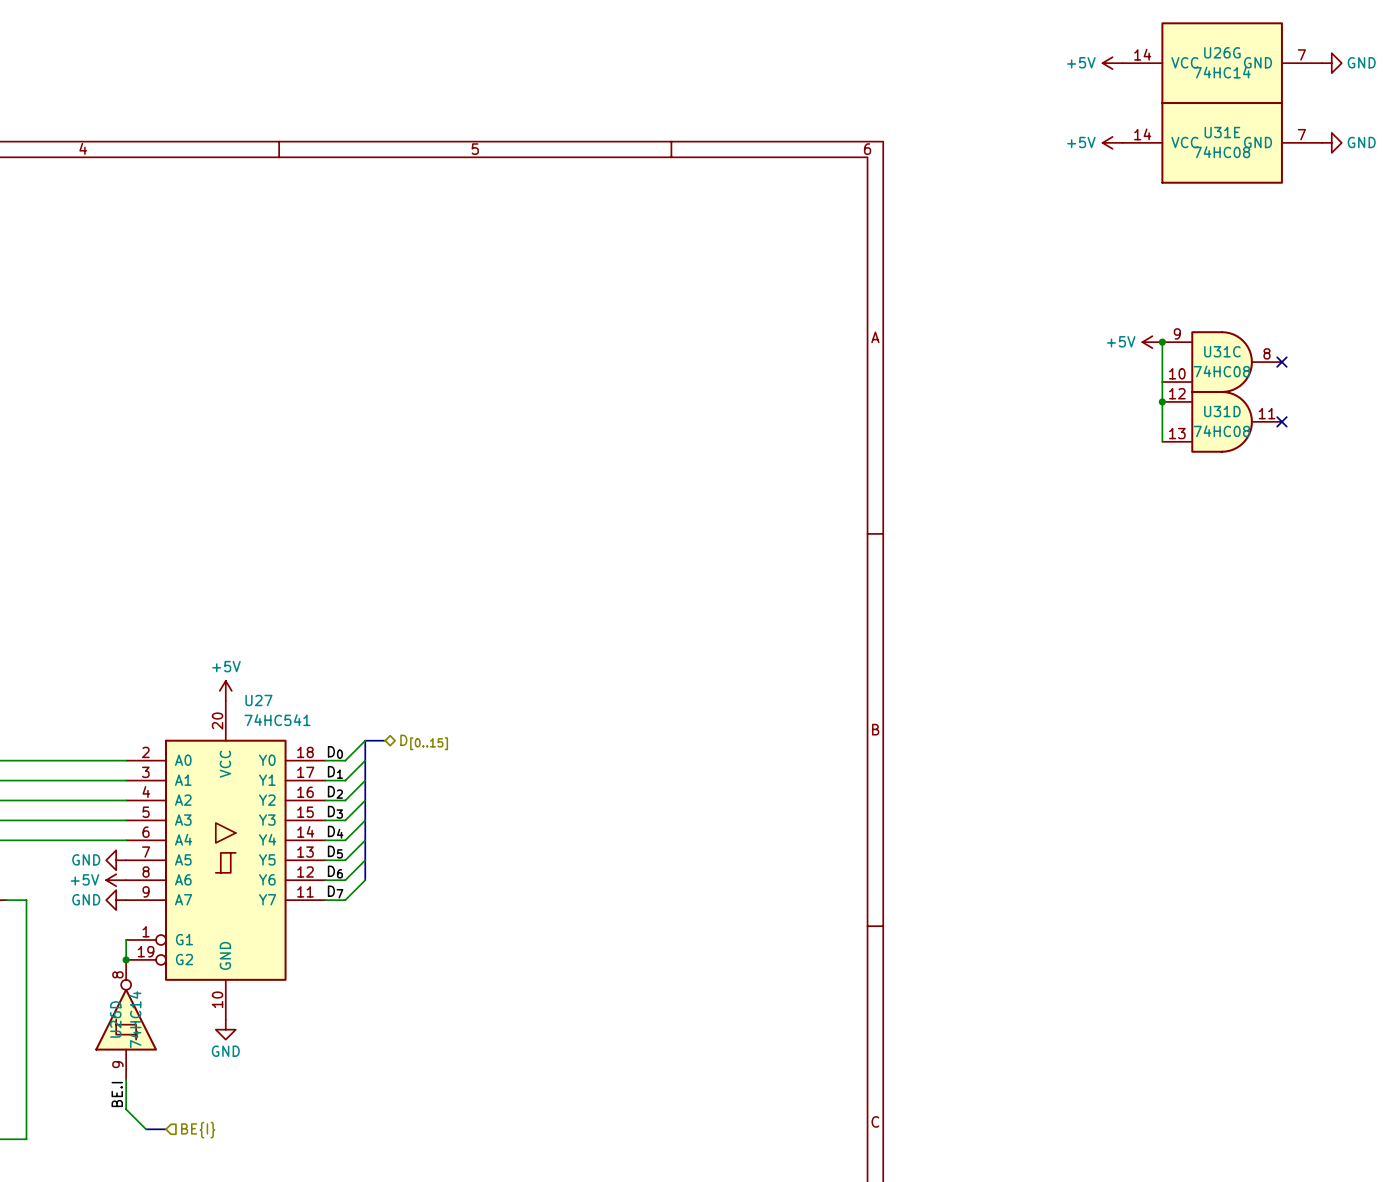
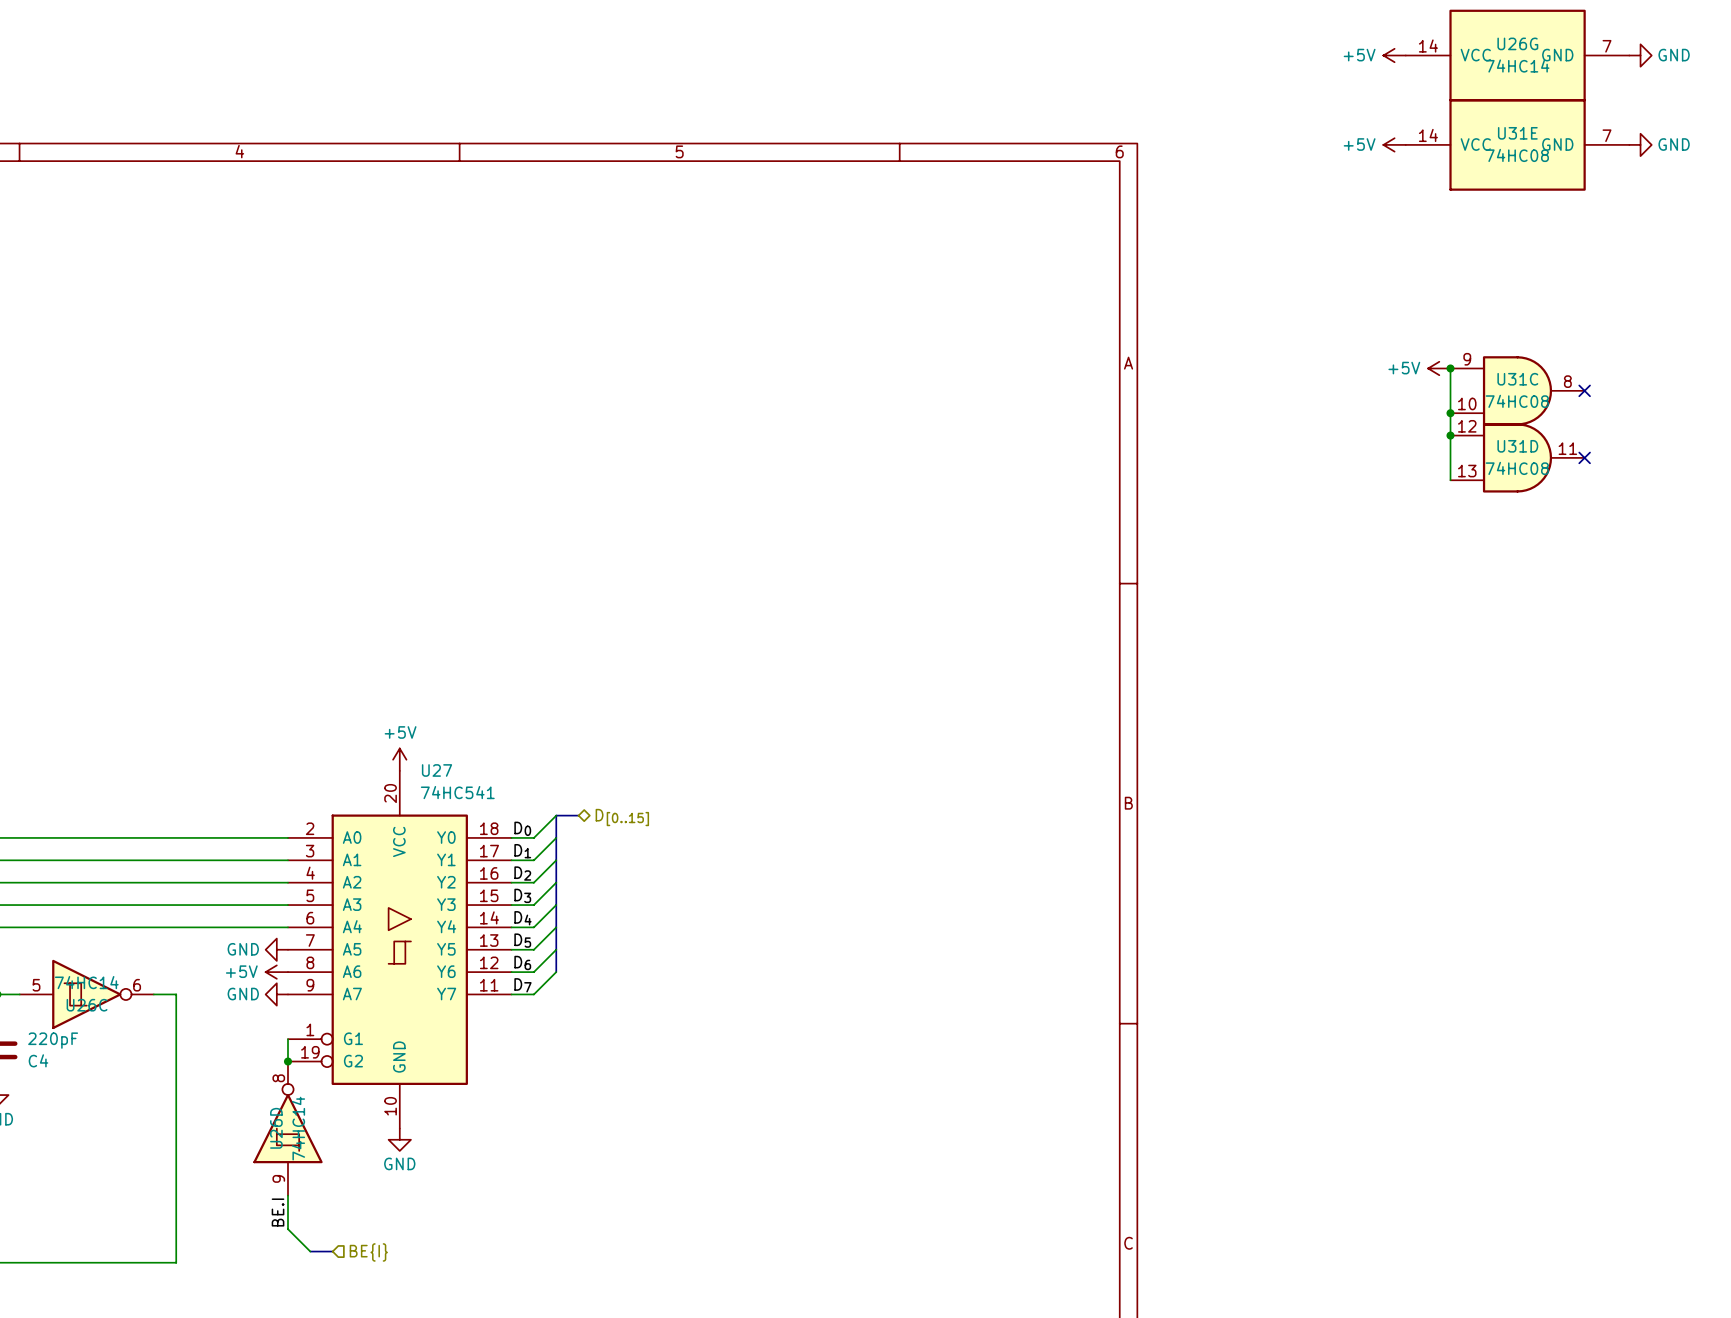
junction: none -> (1450, 413)

